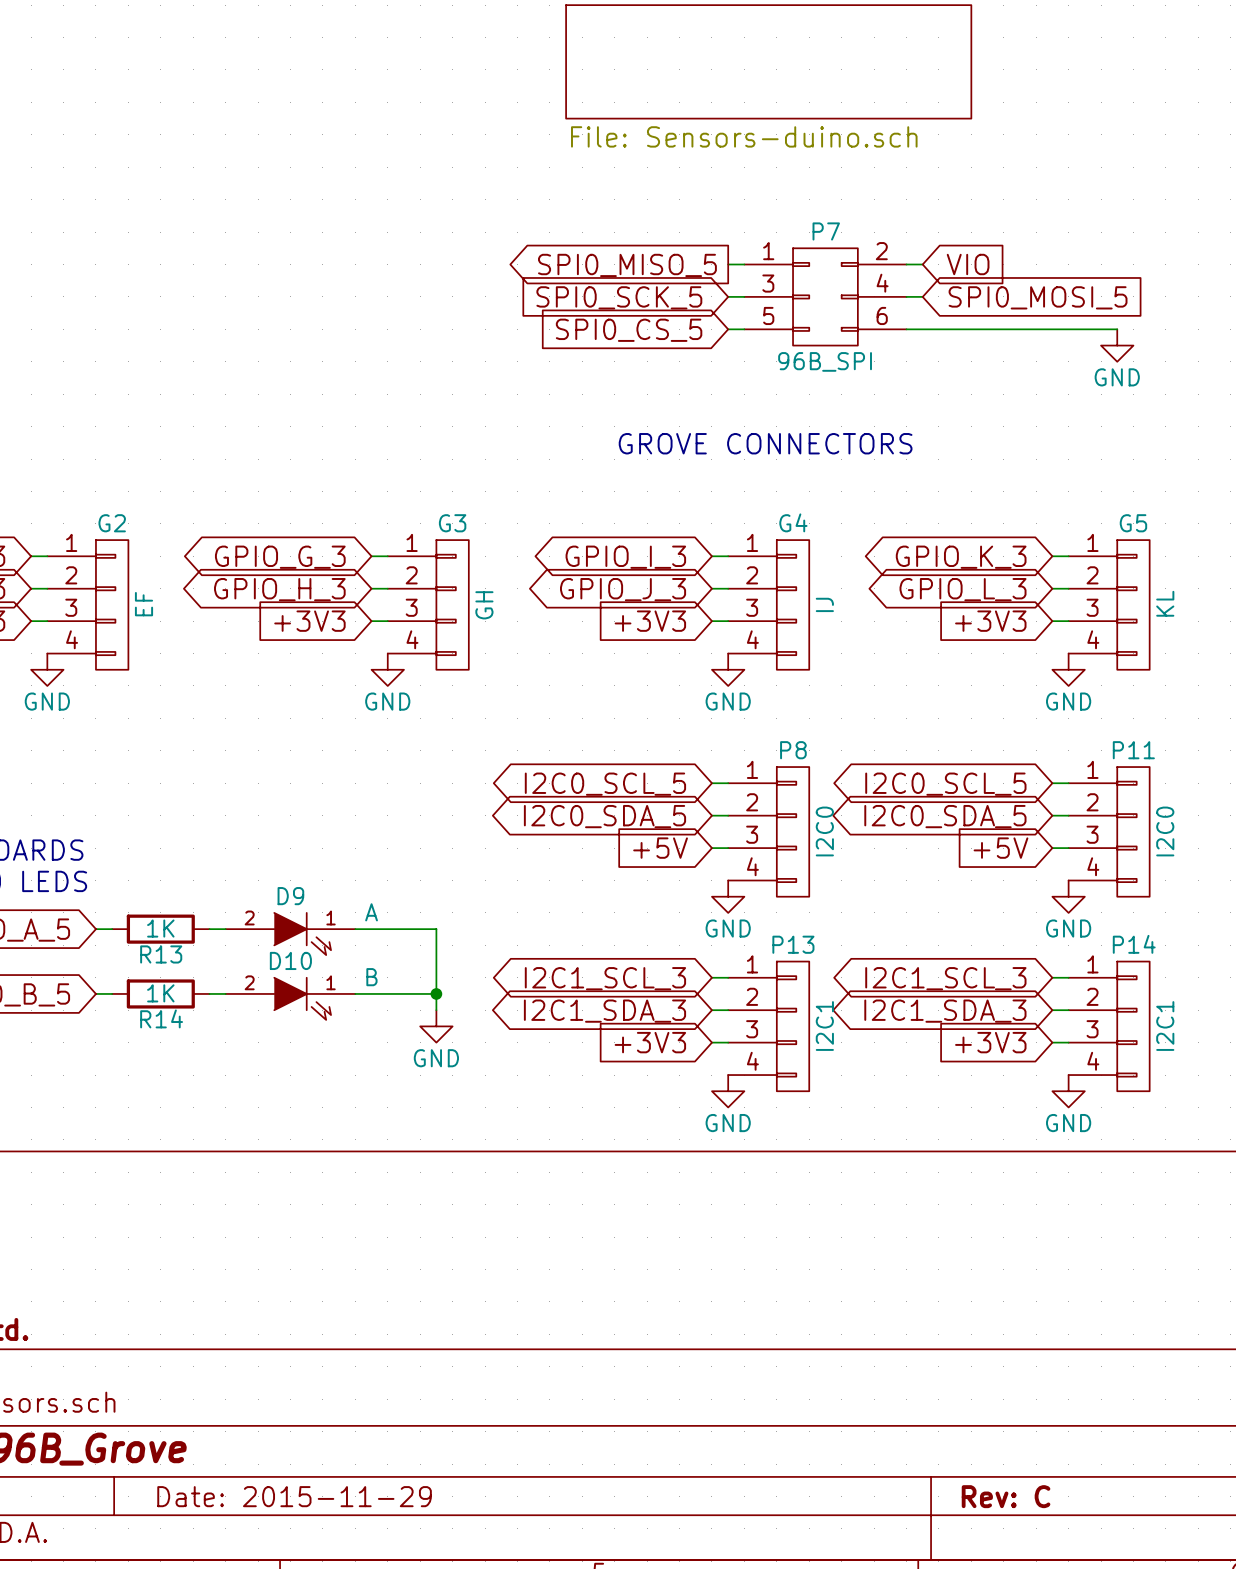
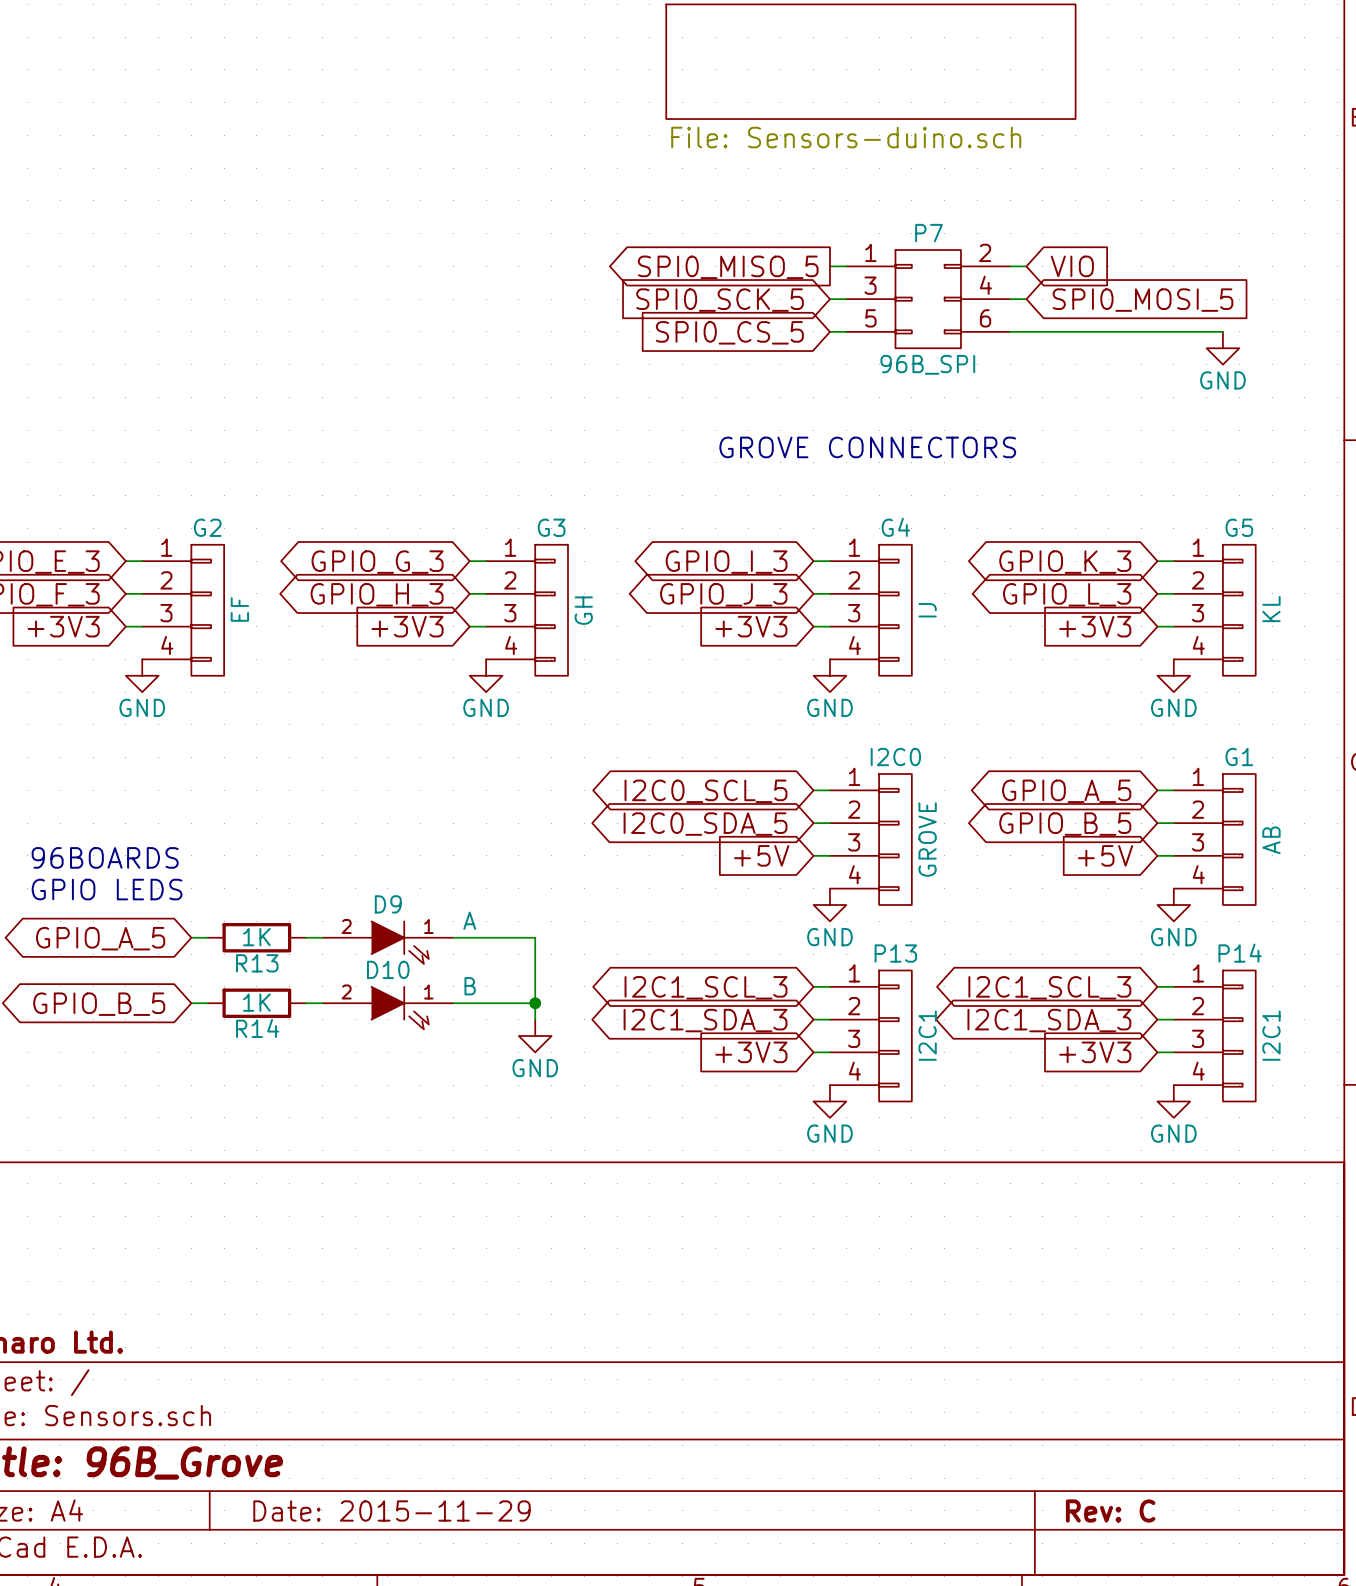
P8 name: P8 (793, 750) -> I2C0 (895, 757)
P11 name: P11 (1133, 750) -> G1 (1239, 757)
global label: I2C0_SCL_5 (945, 784) -> GPIO_A_5 (1066, 791)
global label: I2C0_SDA_5 (945, 816) -> GPIO_B_5 (1065, 824)
P8 value: I2C0 (824, 831) -> GROVE (927, 839)
P11 value: I2C0 (1165, 831) -> AB (1271, 840)

